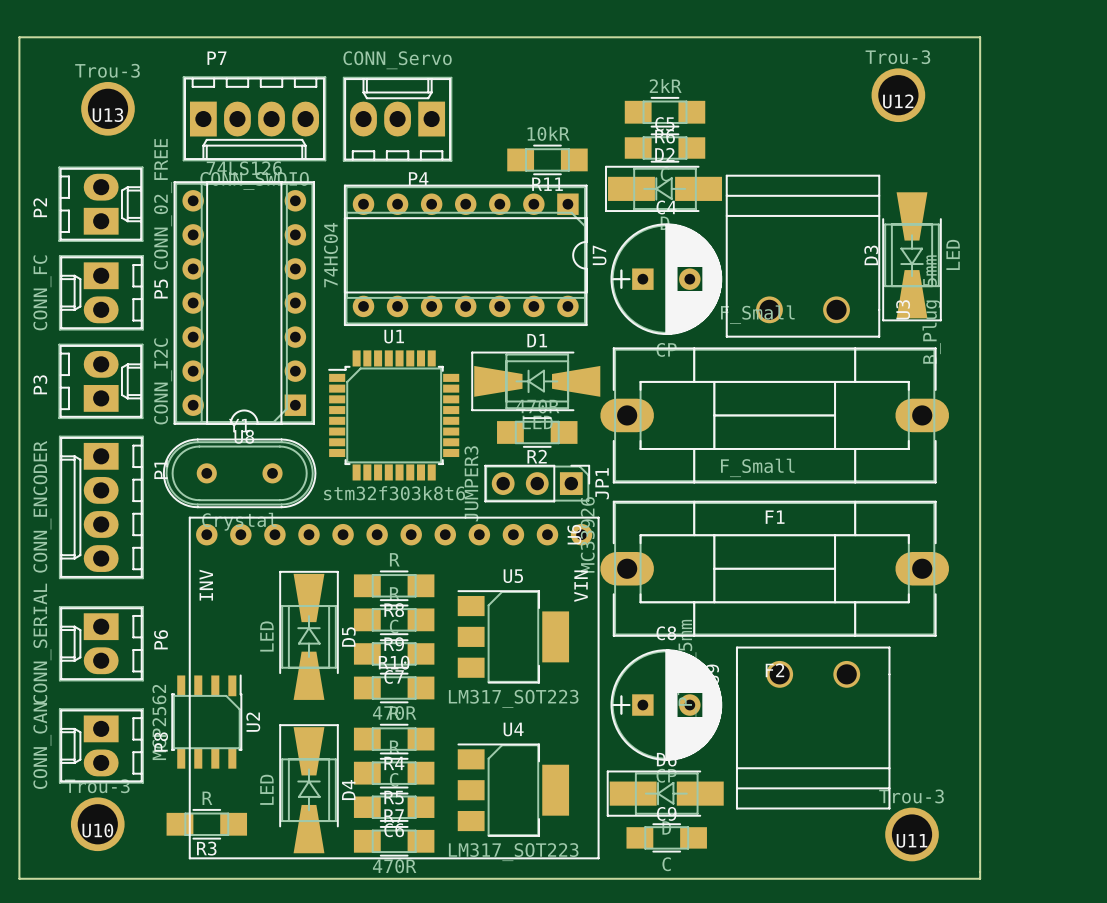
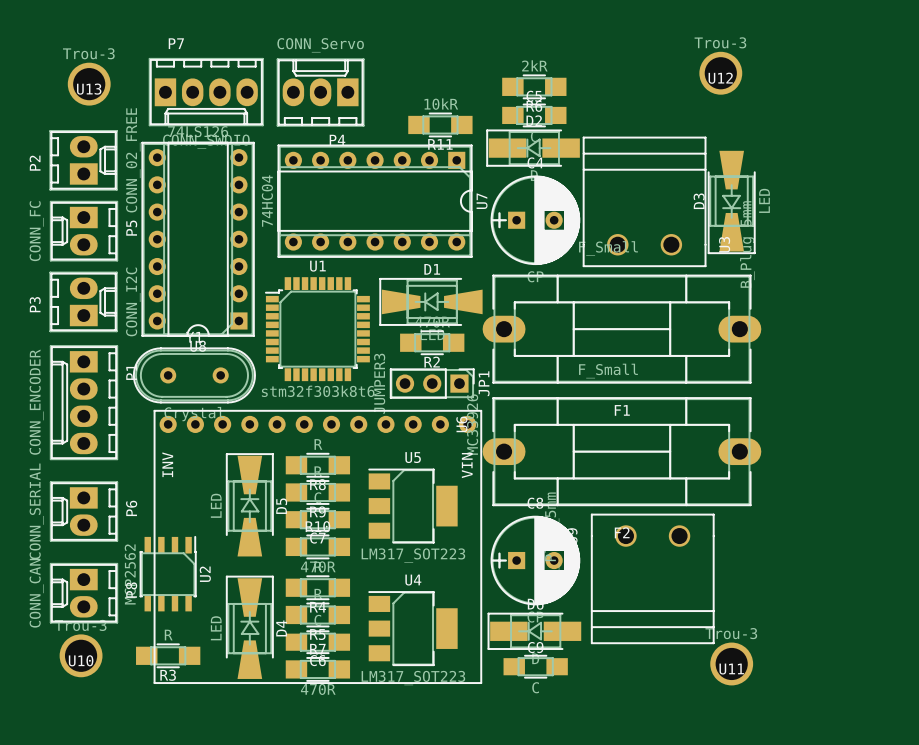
board edge: (19, 37) (19, 878) (980, 878) (980, 37) (19, 37) -> none

